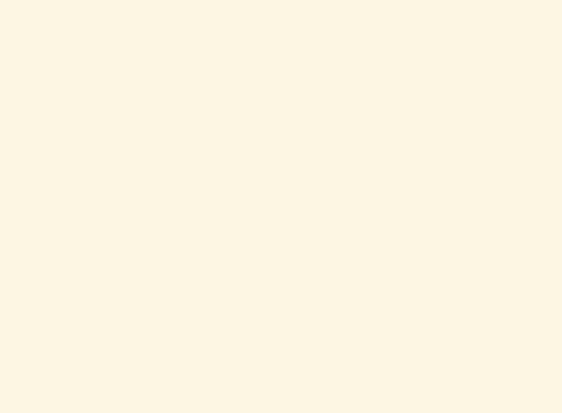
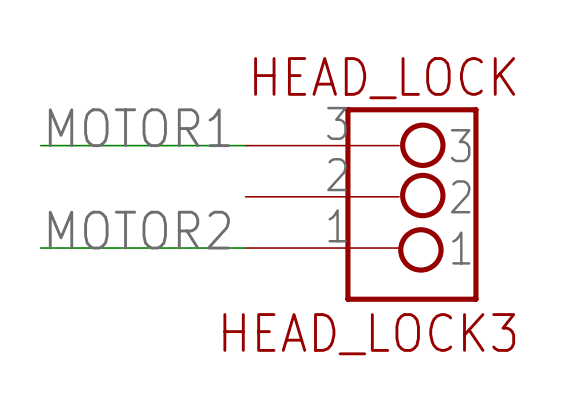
label: none -> MOTOR1 (139, 127)
wire: none -> (40, 145) (245, 145)
HEAD_LOCK3: none -> HEAD_LOCK (362, 204)
label: none -> MOTOR2 (139, 230)
wire: none -> (40, 248) (245, 248)

